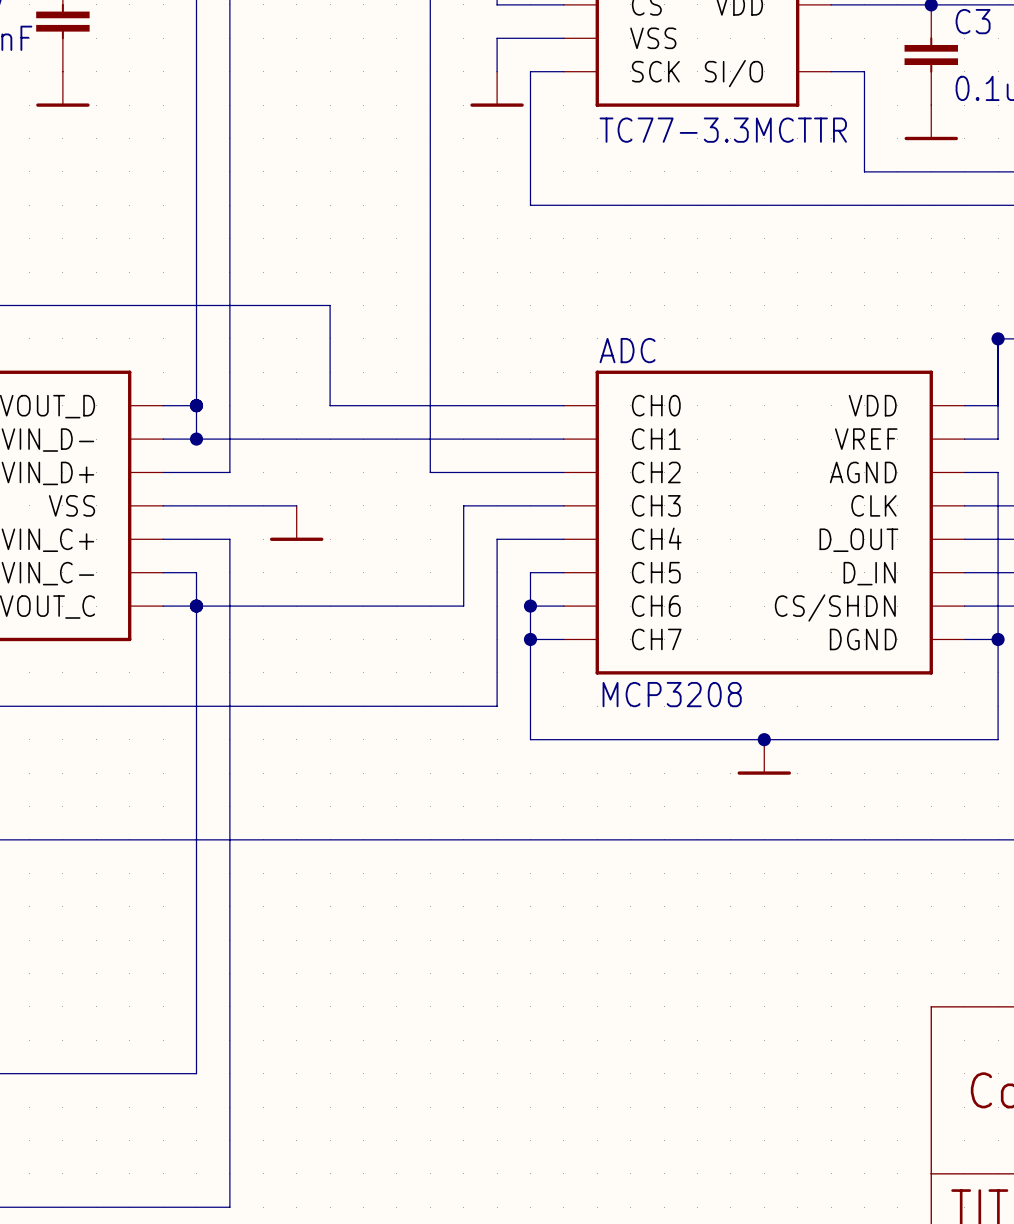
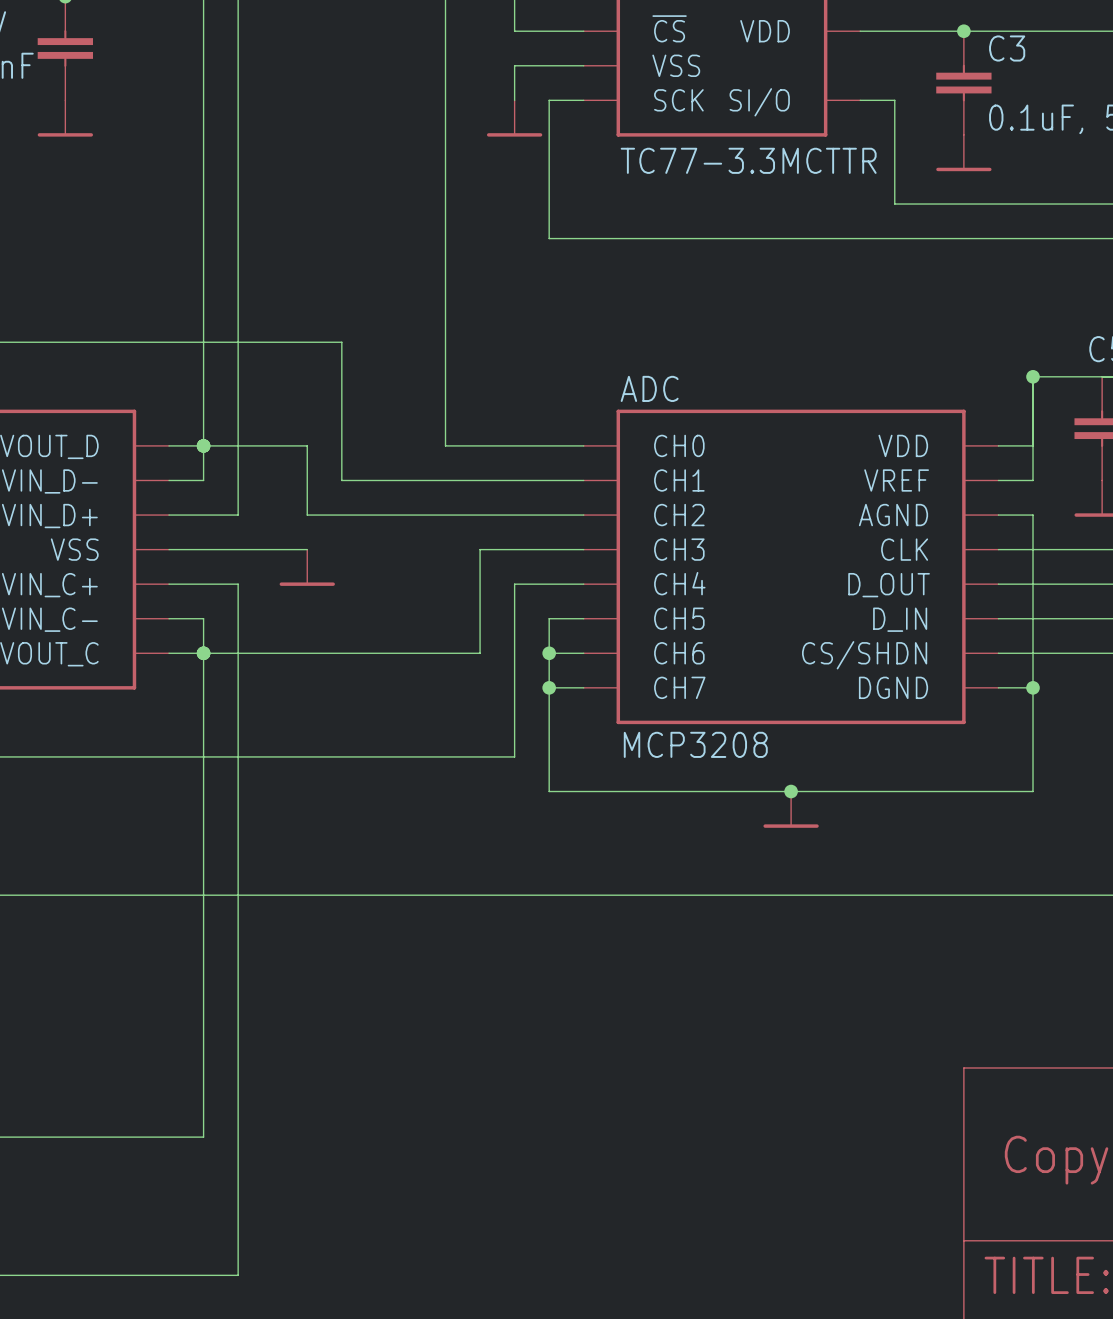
wire: none -> (203, 445) (307, 445) (307, 515) (445, 515)
wire: (330, 405) (430, 405) (430, 472) -> (341, 445) (341, 480)
wire: (196, 439) (330, 439) -> none
junction: (196, 439) -> none

